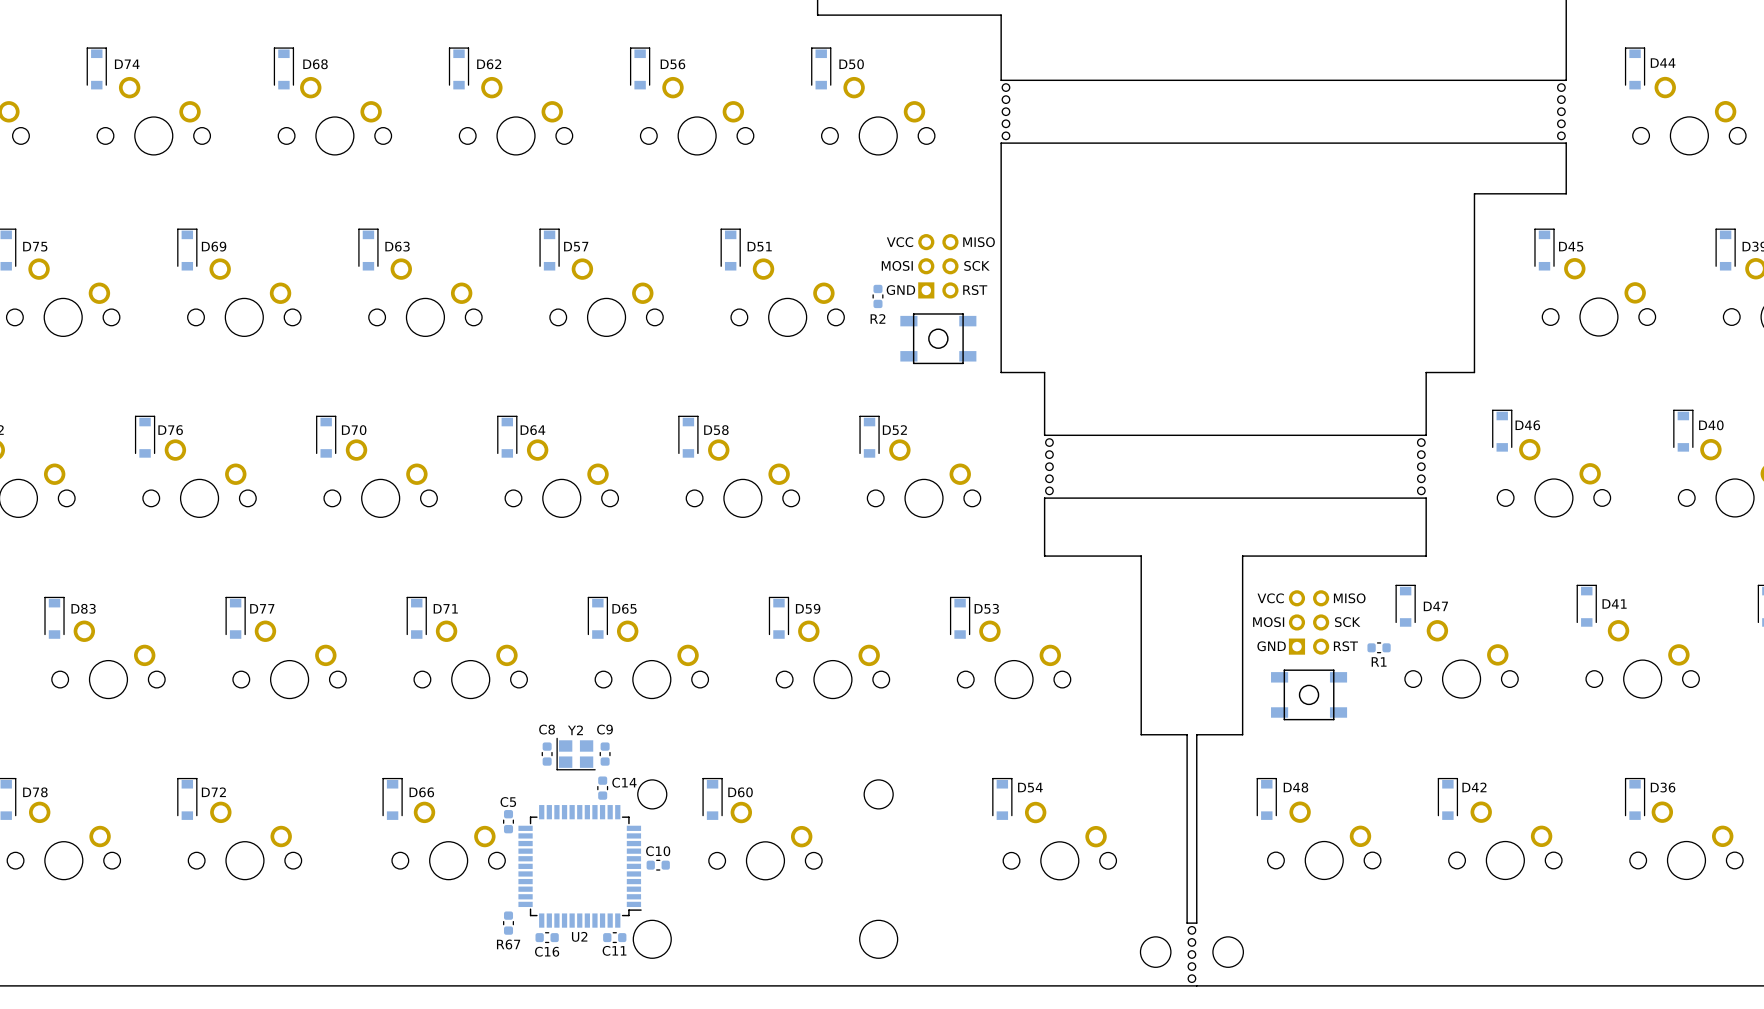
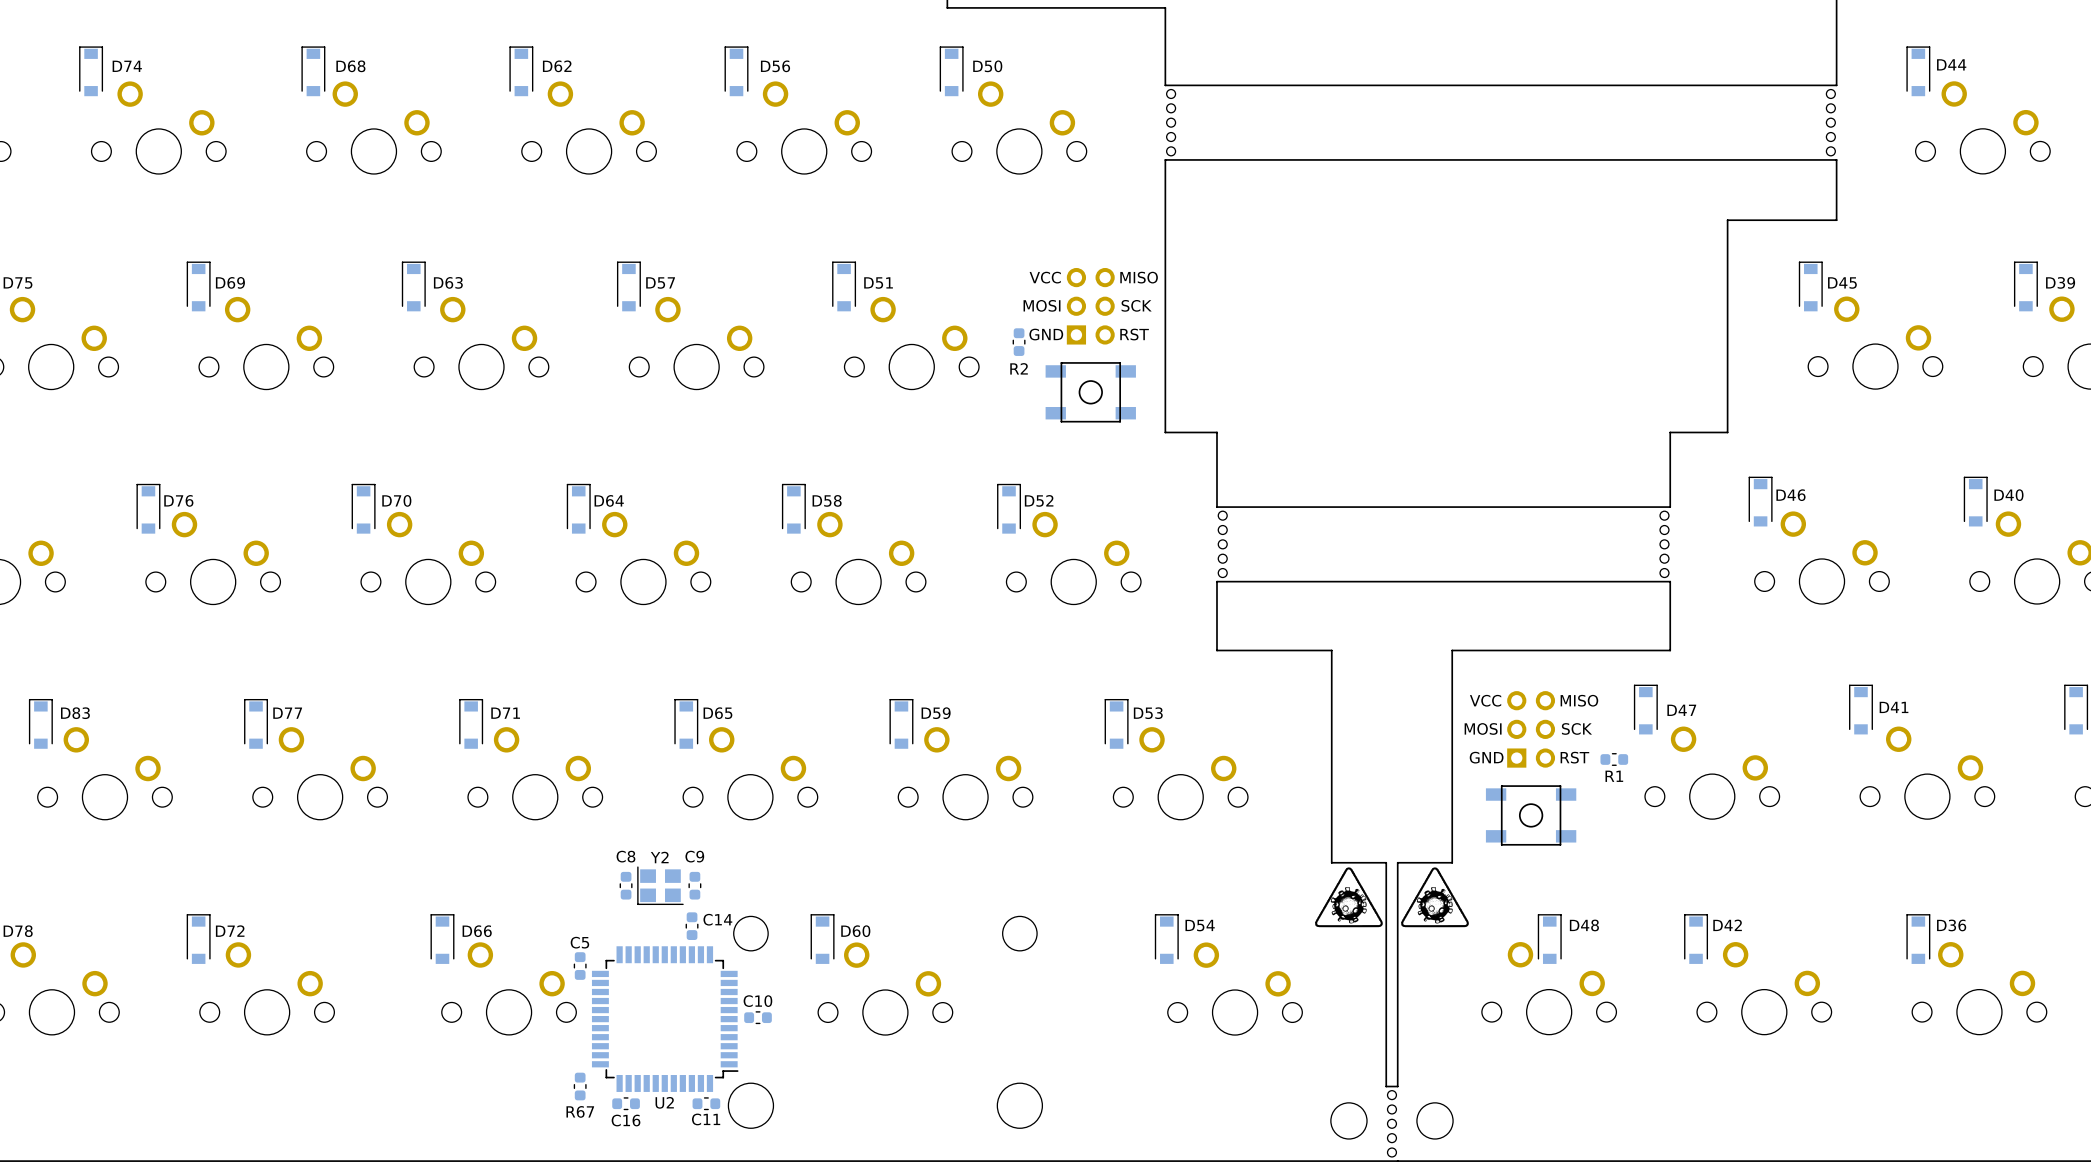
drawing: none -> [1315, 867, 1383, 928]
drawing: none -> [1401, 867, 1469, 928]
D48 position: (1266, 798) -> (1549, 939)

